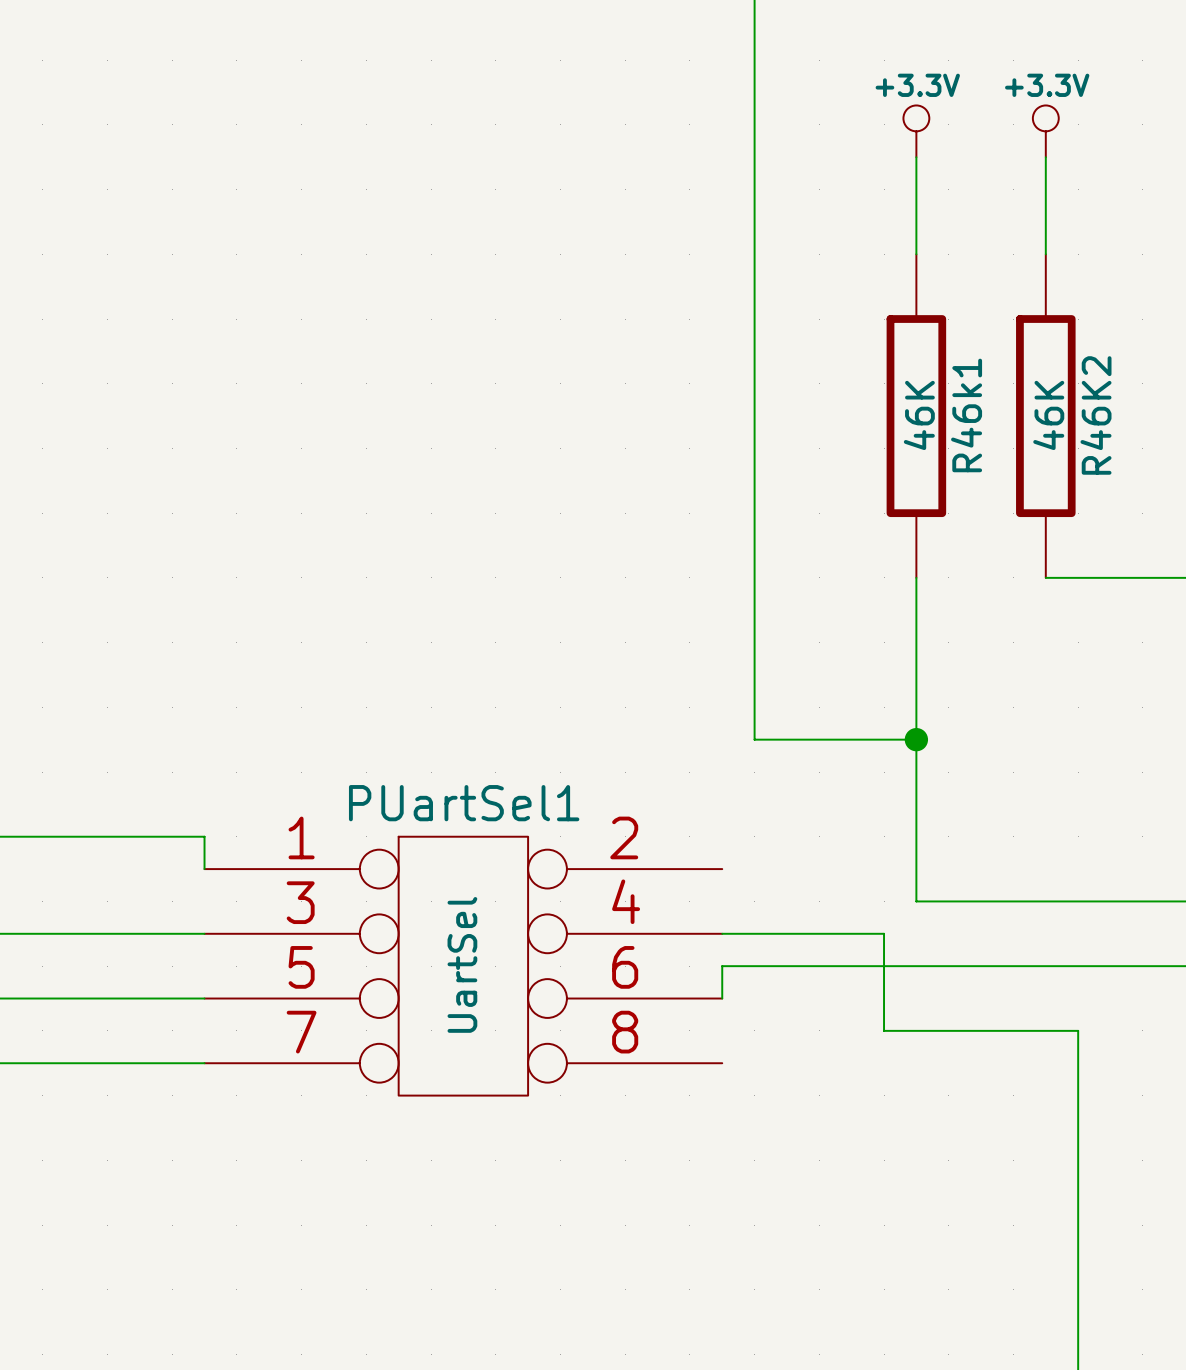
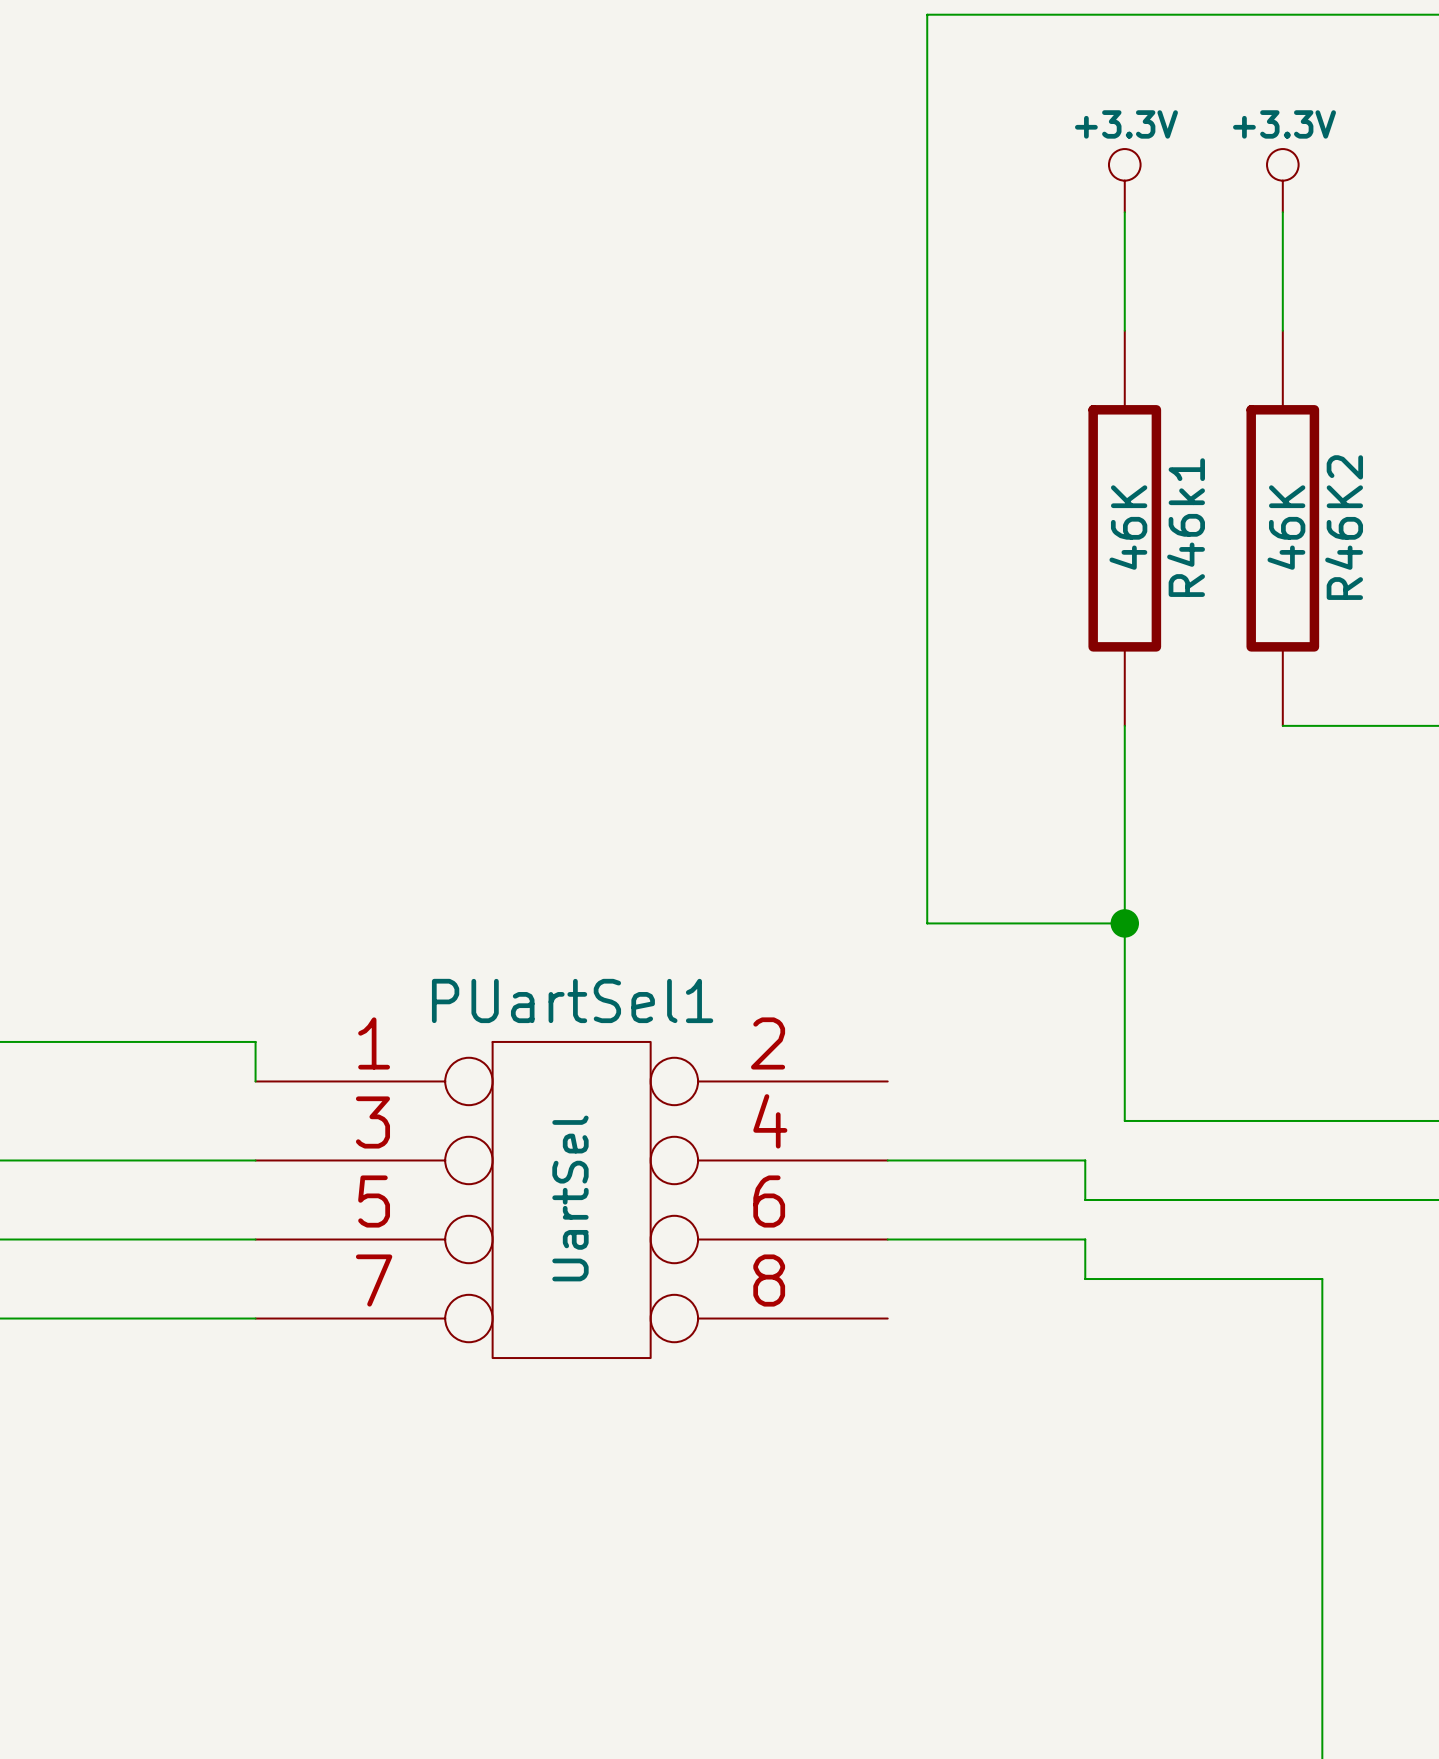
wire: (722, 998) (722, 966) (884, 966) (884, 998) -> (887, 1239) (1085, 1239)

